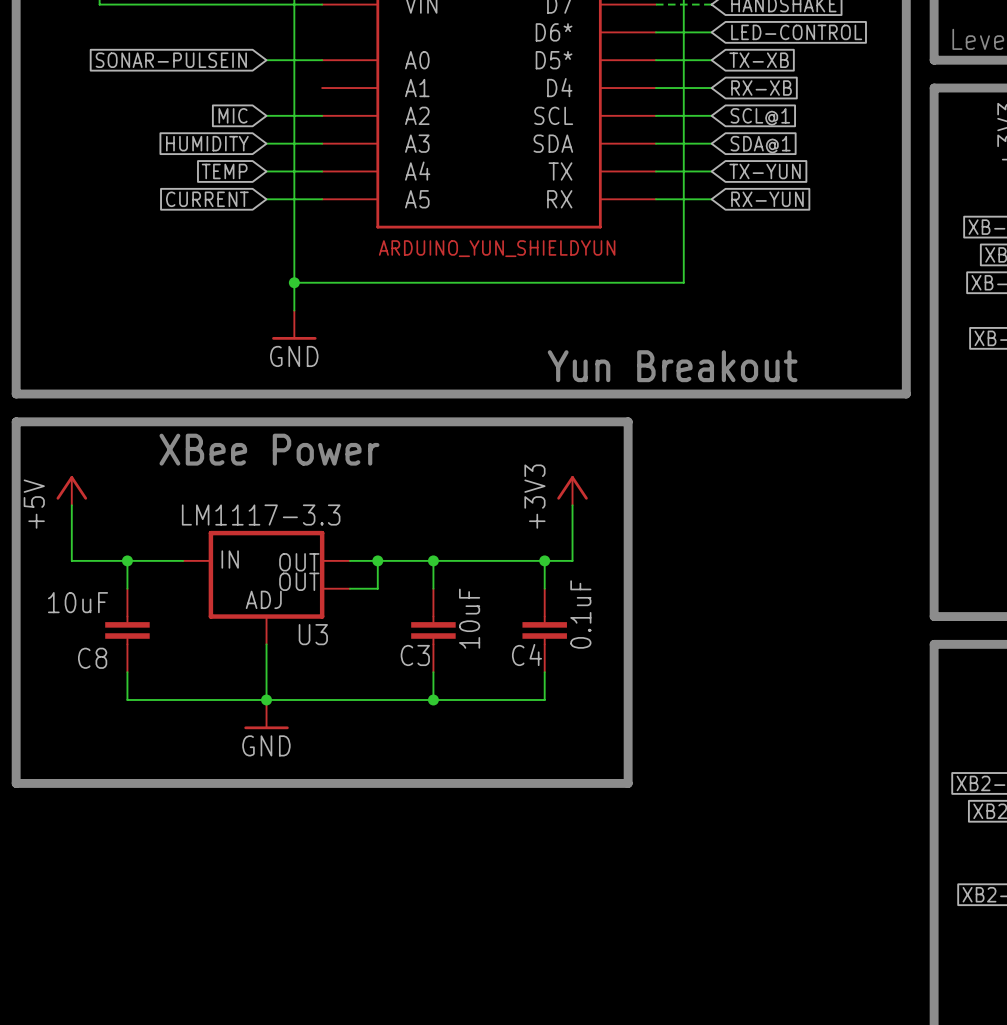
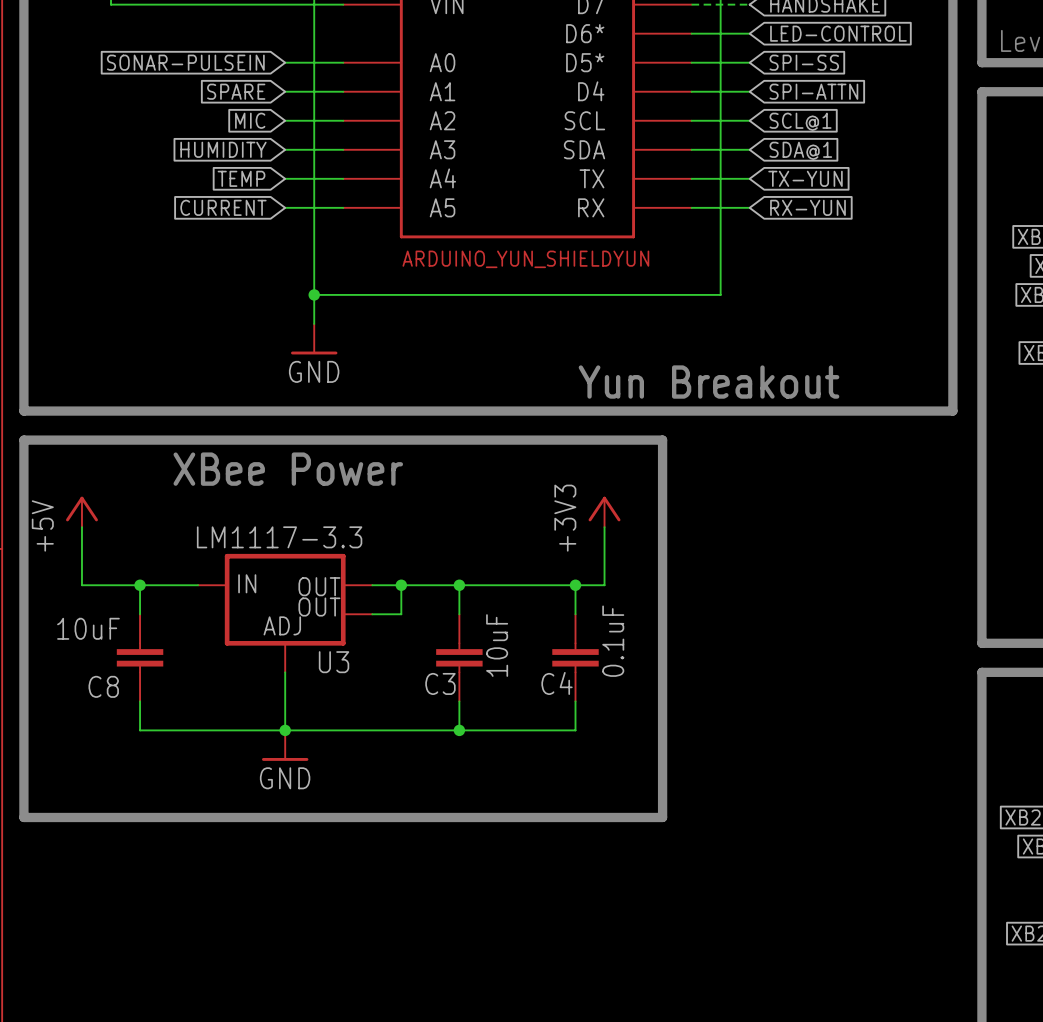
global label: TX-XB (759, 60) -> SPI-SS (804, 62)
global label: none -> SPARE (236, 91)
wire: none -> (285, 91) (343, 91)
global label: RX-XB (761, 88) -> SPI-ATTN (813, 91)

